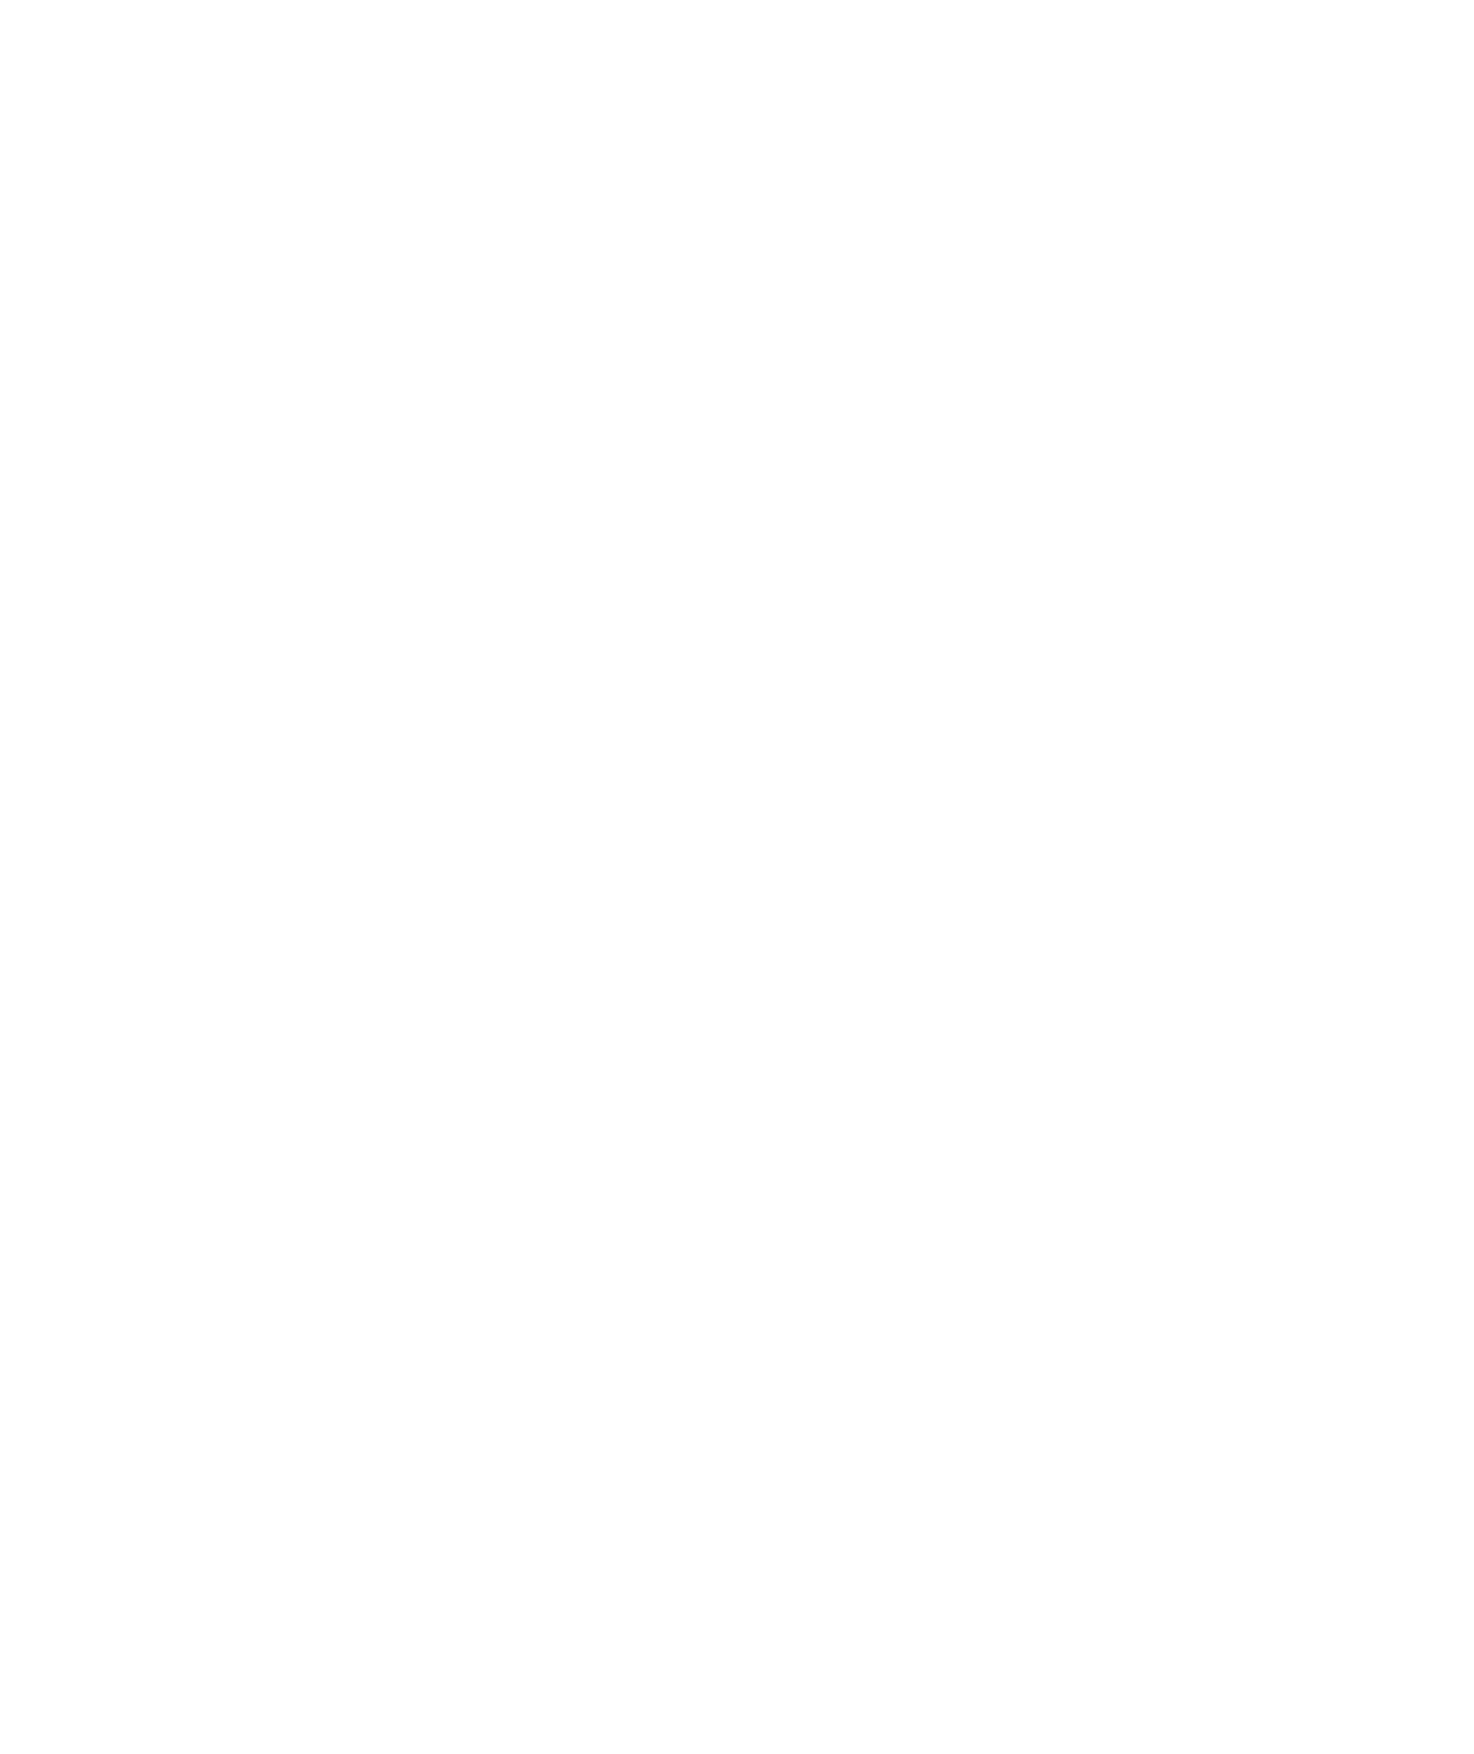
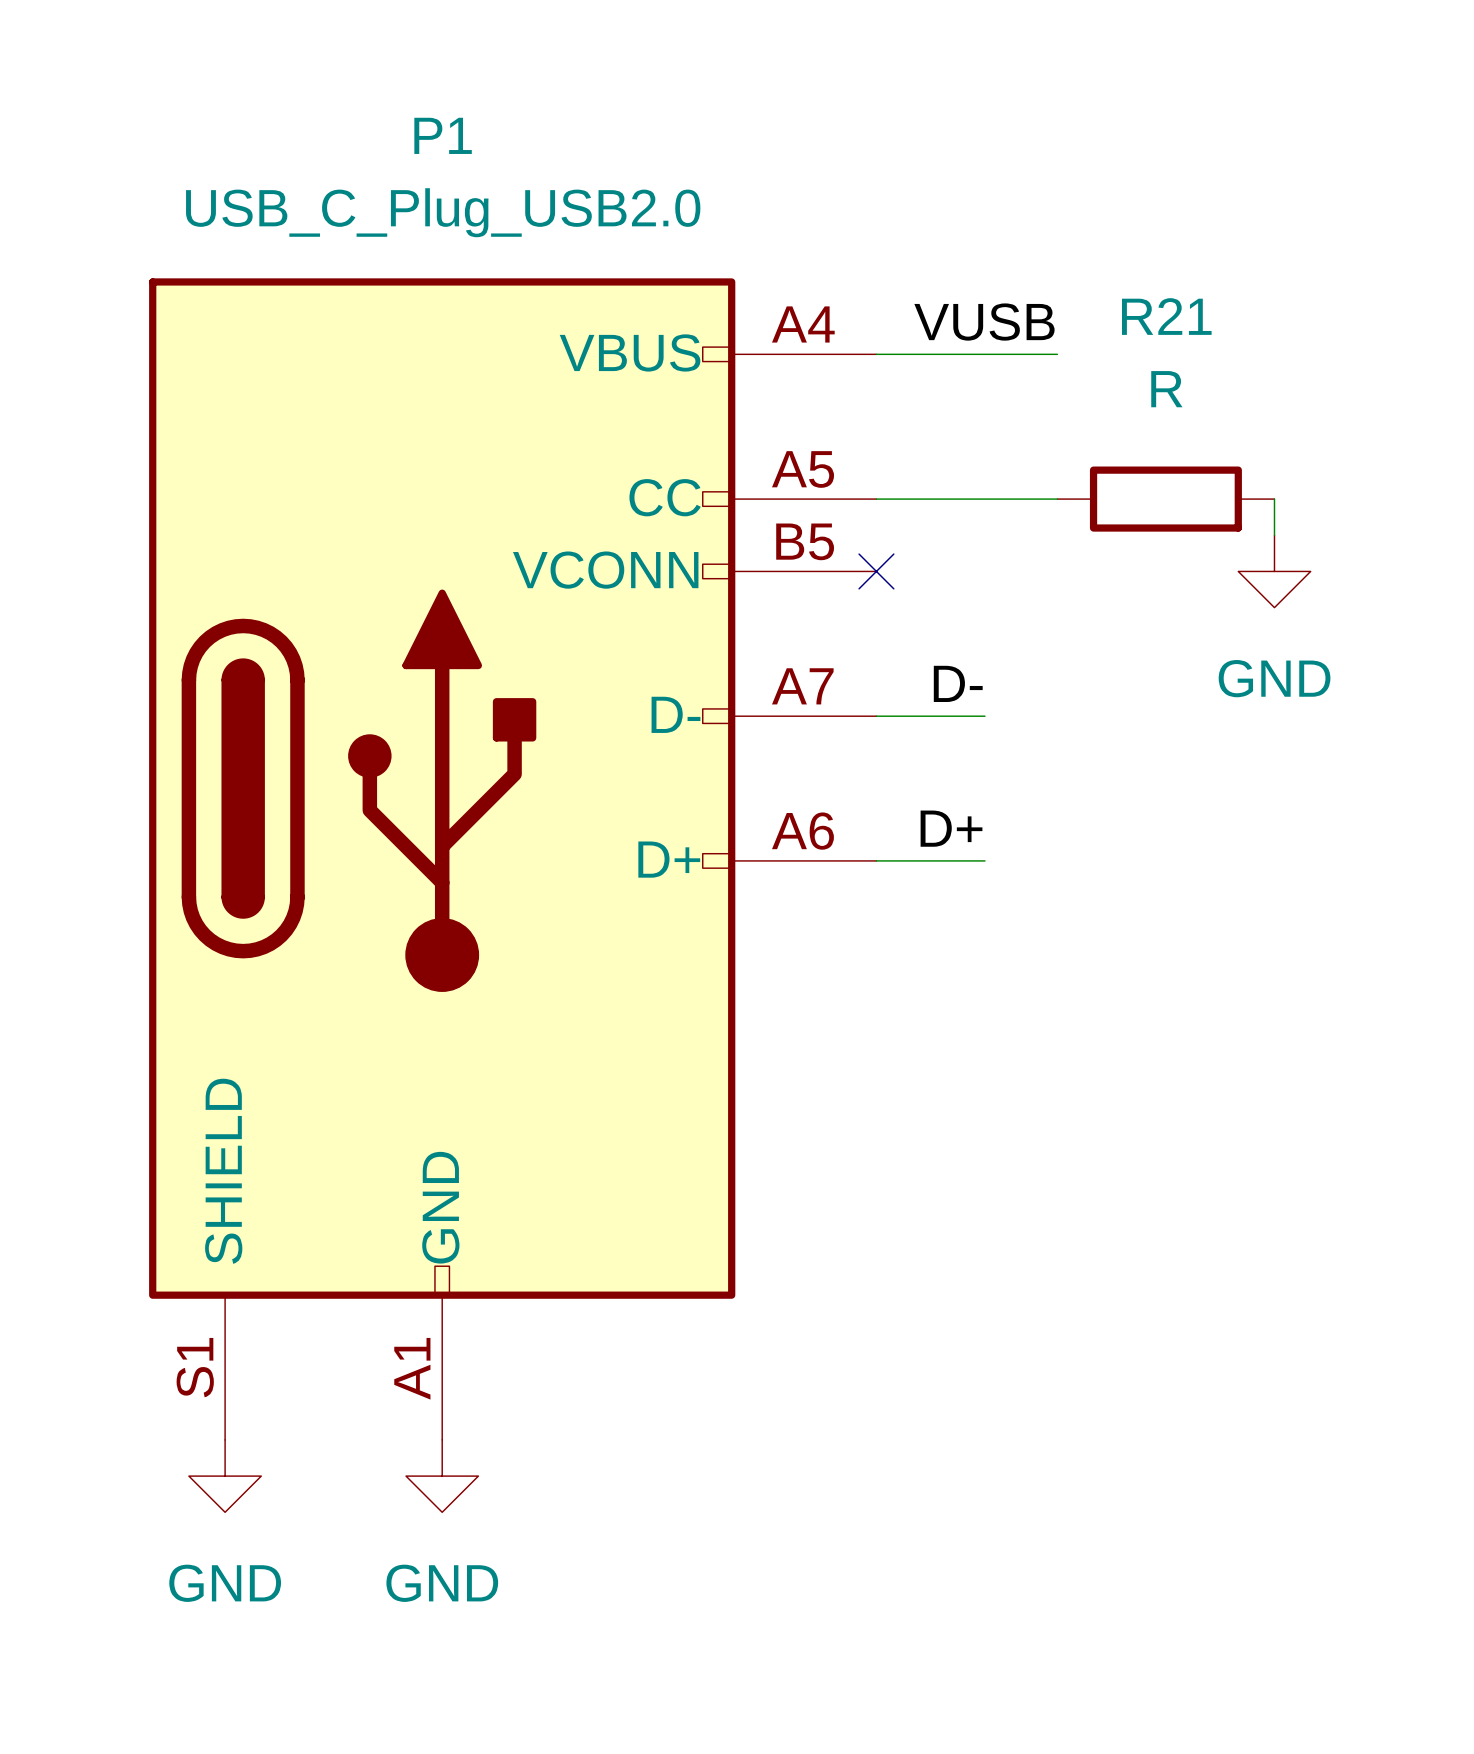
label: none -> VUSB (984, 322)
wire: none -> (876, 354) (1057, 354)
wire: none -> (876, 499) (1057, 499)
R21: none -> R (1165, 499)
wire: none -> (1274, 499) (1274, 535)
no-connect mark: none -> (876, 571)
power symbol: none -> GND (1274, 571)
label: none -> D- (958, 683)
wire: none -> (876, 716) (984, 716)
label: none -> D+ (951, 828)
P1: none -> USB_C_Plug_USB2.0 (512, 859)
wire: none -> (876, 860) (984, 860)
power symbol: none -> GND (225, 1476)
power symbol: none -> GND (442, 1476)

